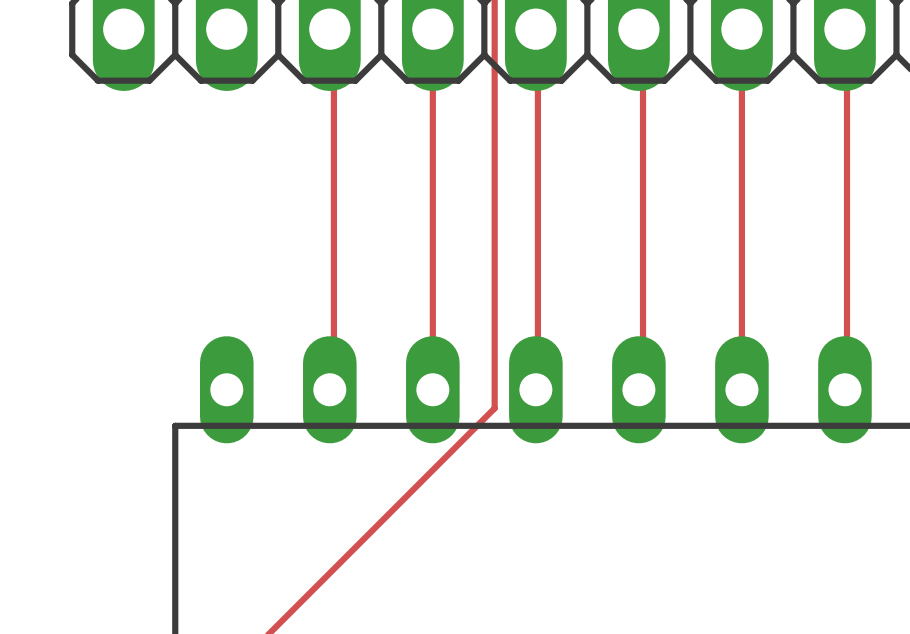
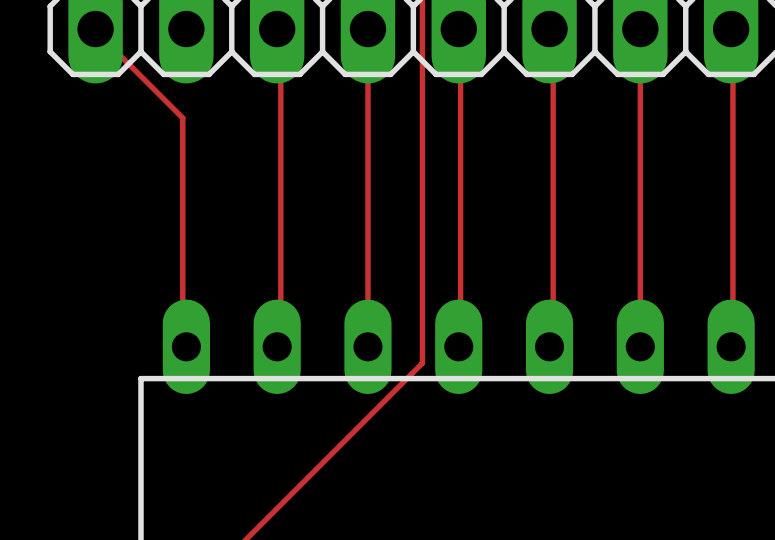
track: none -> (95, 29) (182, 118) (182, 346) (186, 346)

